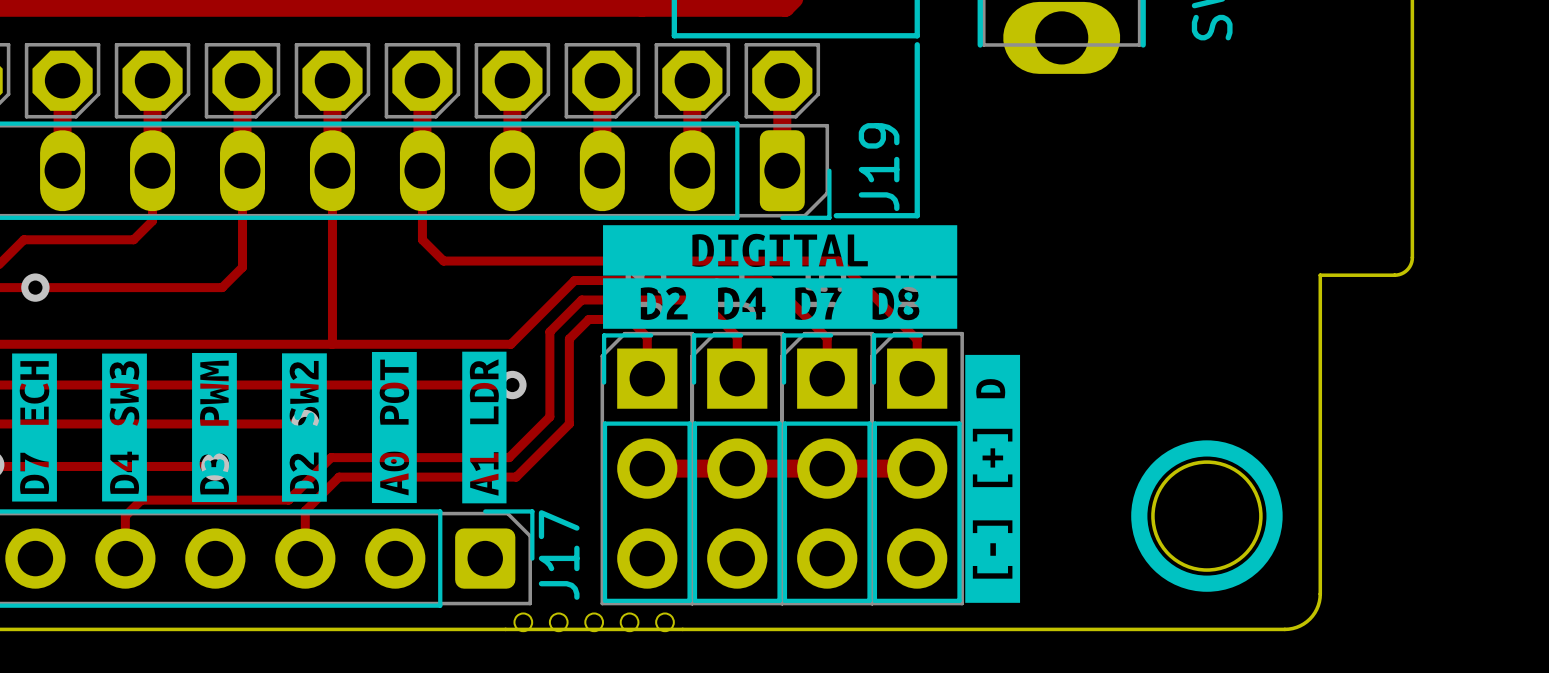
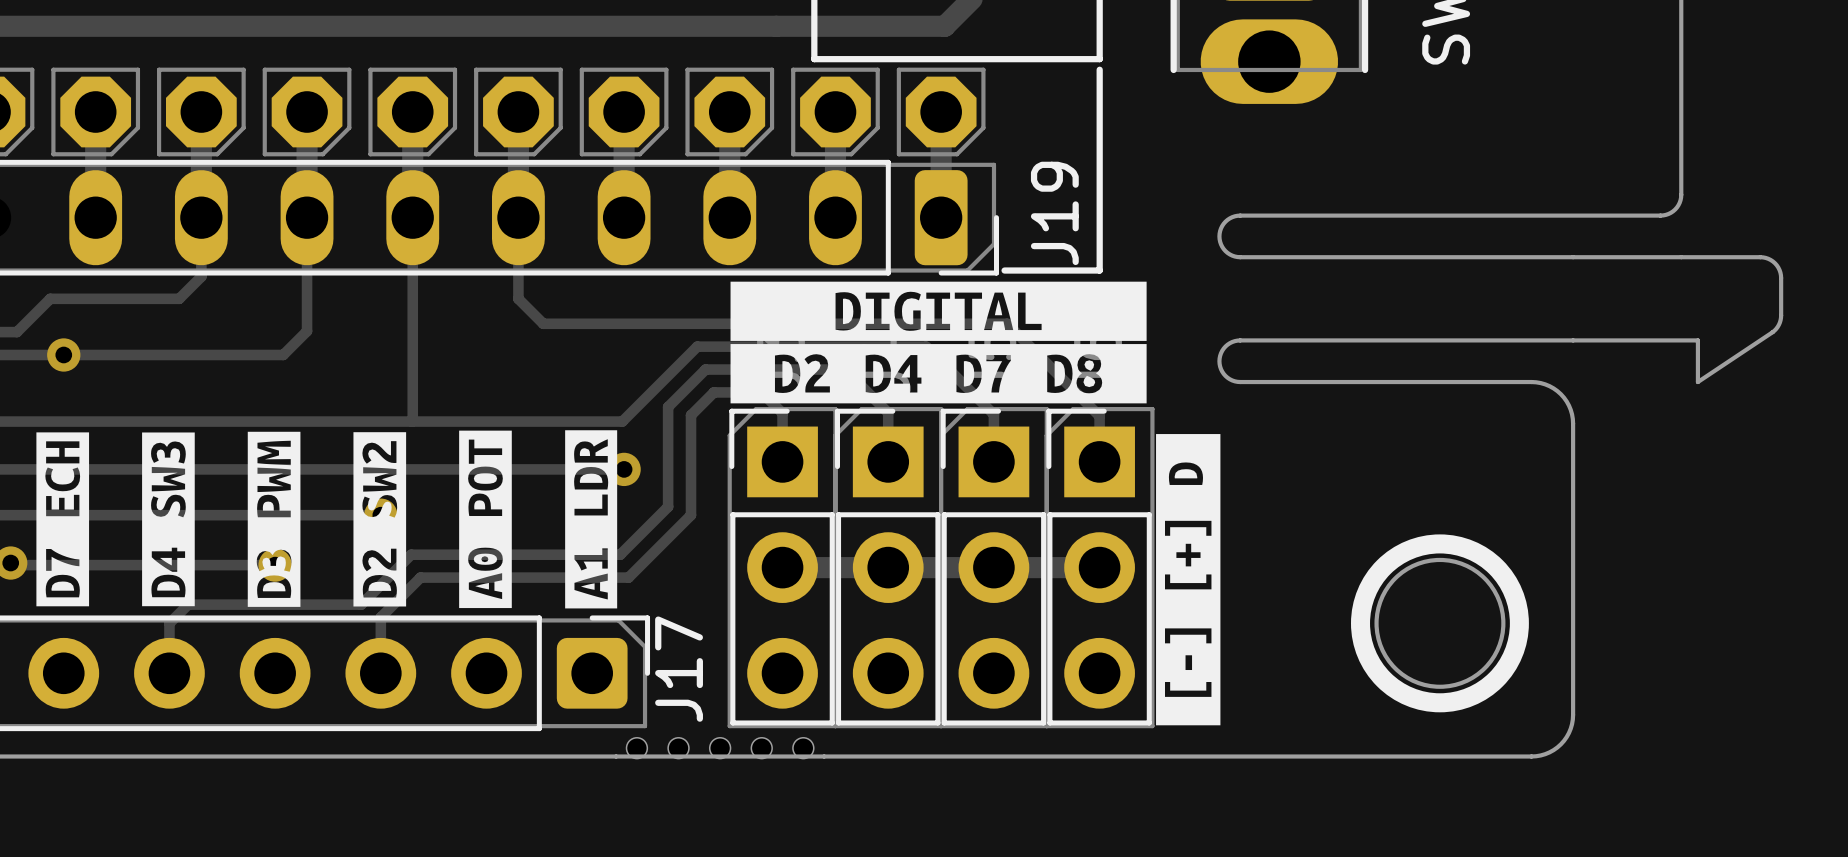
board edge: (1412, 151) (1412, 259) (1407, 270) (1394, 275) -> (1681, 194) (1676, 207) (1670, 212) (1663, 215) (1240, 215) (1227, 219) (1222, 226) (1219, 233) (1220, 241) (1223, 249) (1229, 254) (1240, 257) (1760, 257) (1770, 259) (1778, 267) (1781, 278) (1781, 315) (1777, 326) (1772, 332) (1697, 382) (1697, 340) (1660, 340)
board edge: (1320, 275) (1320, 346) -> (1573, 340) (1240, 340) (1232, 342) (1225, 346) (1221, 353) (1219, 361) (1223, 373) (1229, 379) (1237, 381) (1540, 383) (1553, 388) (1564, 397) (1570, 409) (1573, 423)

